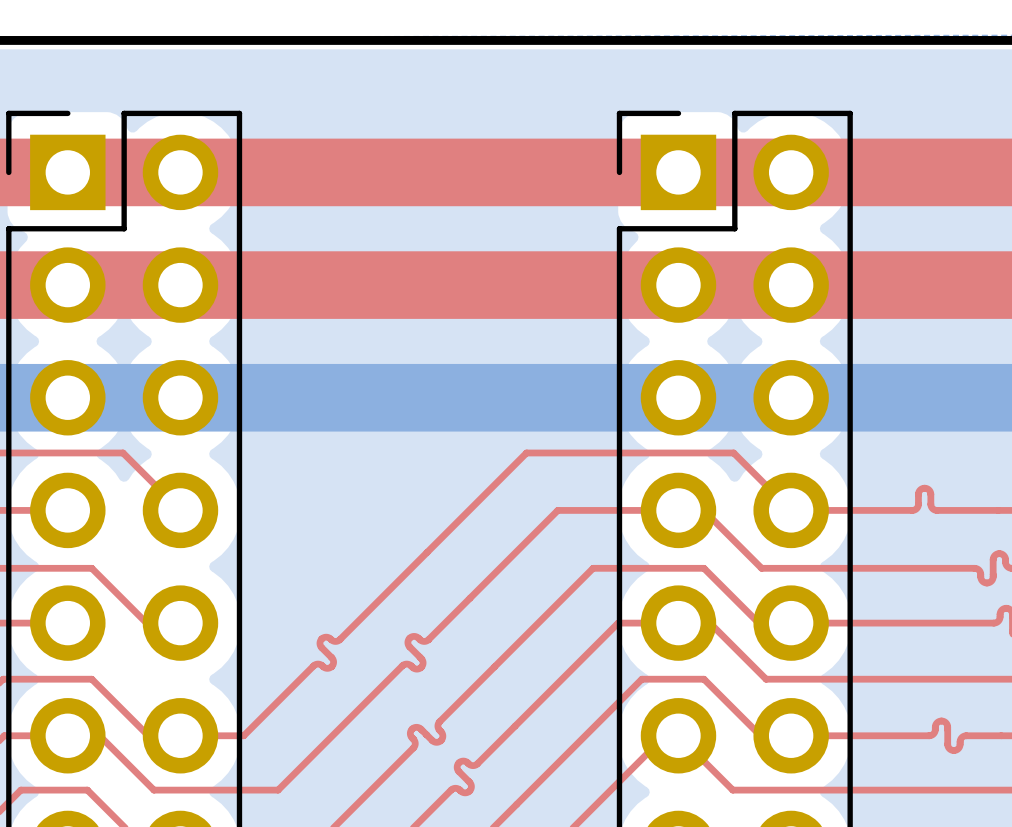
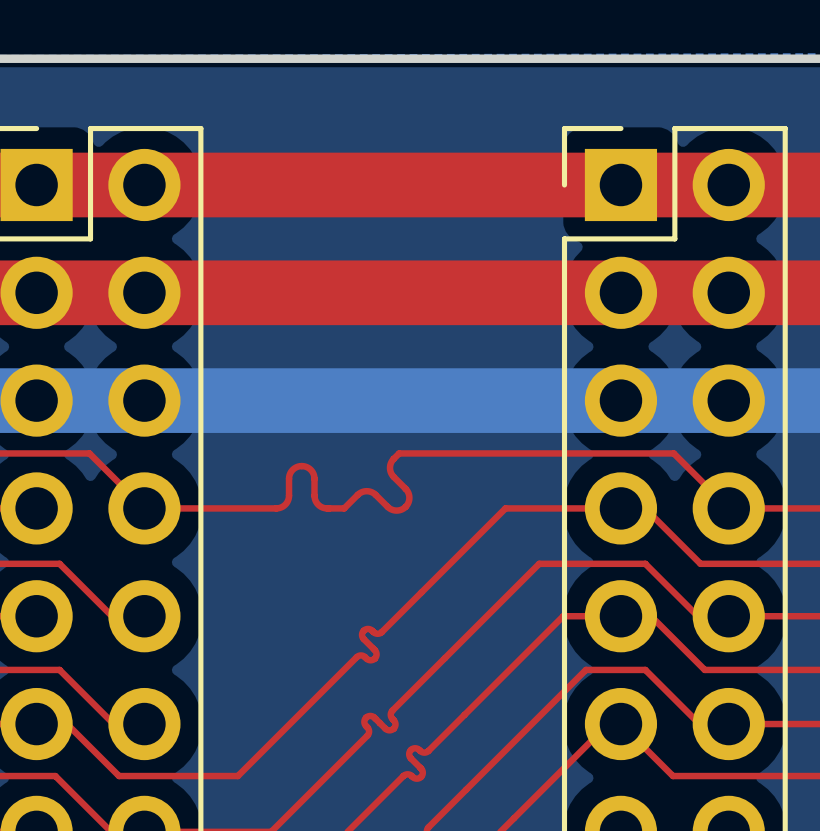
top track: (526, 452) (339, 639) (335, 641) (331, 639) -> (475, 453) (399, 453) (391, 462) (390, 470) (406, 490) (409, 497) (405, 506) (398, 510) (389, 508) (374, 493) (366, 491) (358, 493) (344, 508) (322, 507) (314, 498) (312, 472) (308, 467) (301, 466) (295, 467) (290, 472) (288, 498) (285, 504) (279, 507) (144, 508)
top track: (330, 638) (323, 637) (320, 644) (332, 658) (333, 663) (328, 668) (323, 666) -> none
top track: (322, 665) (318, 664) (314, 665) (243, 735) (180, 735) -> none

